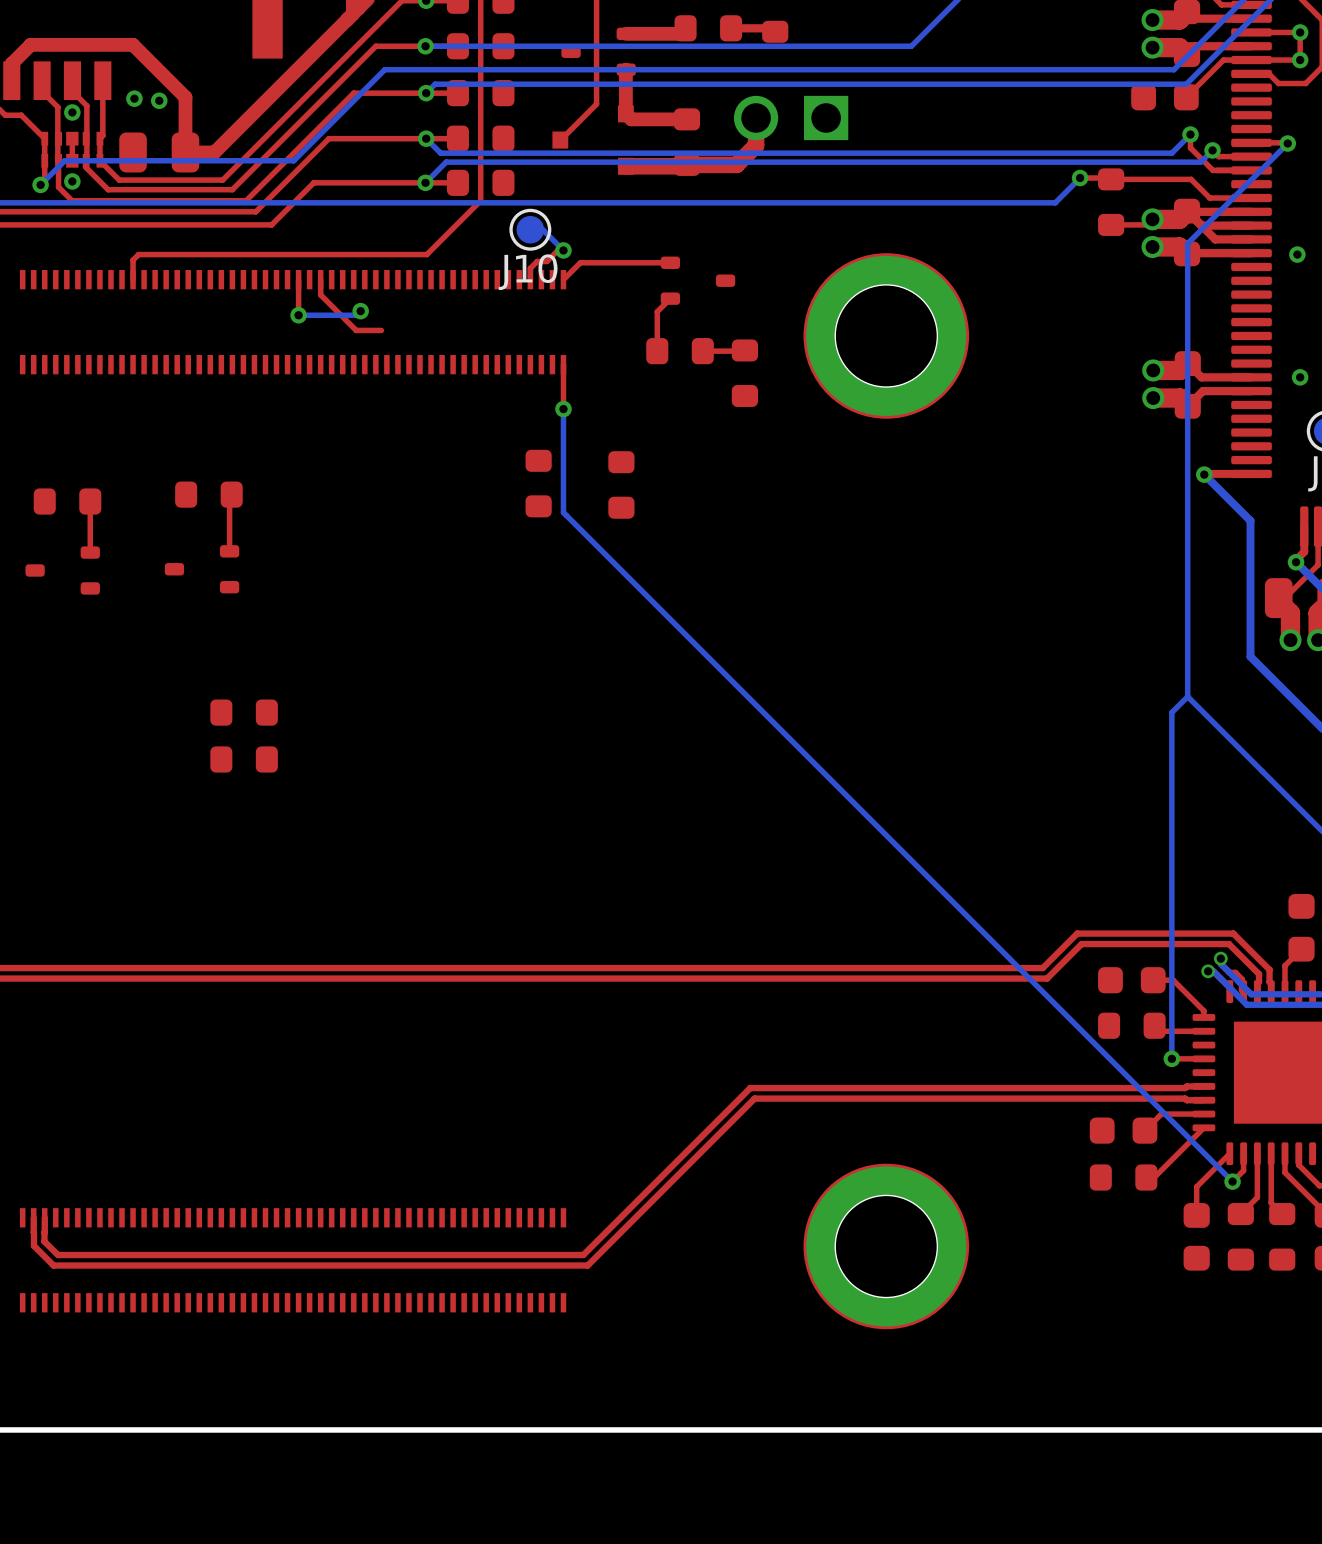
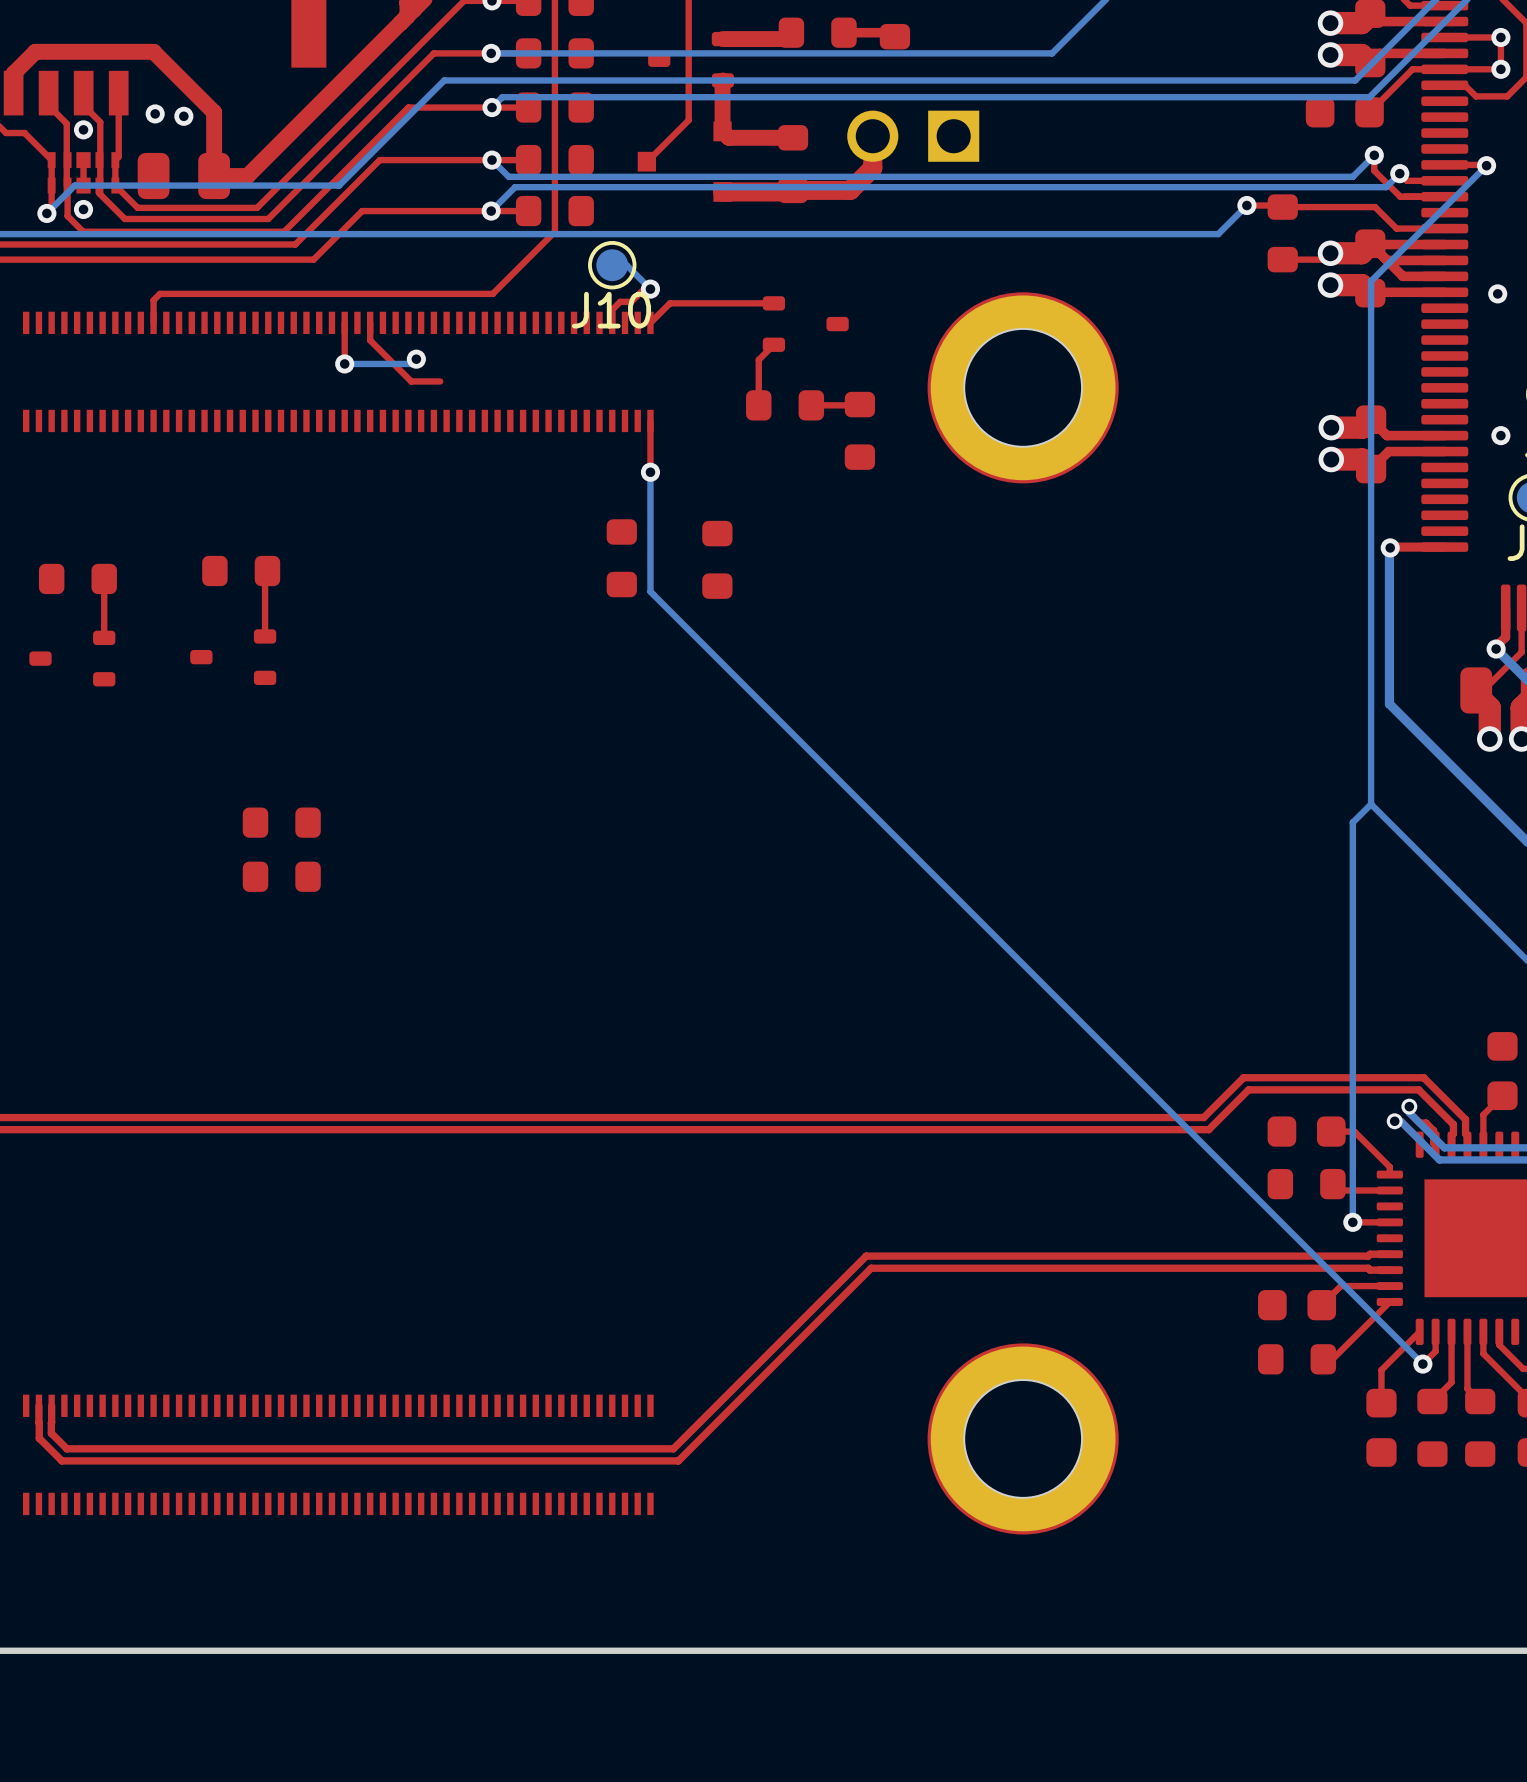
bottom track: (1204, 474) (1250, 520) (1250, 656) -> (1390, 547) (1389, 703) (1443, 758)

